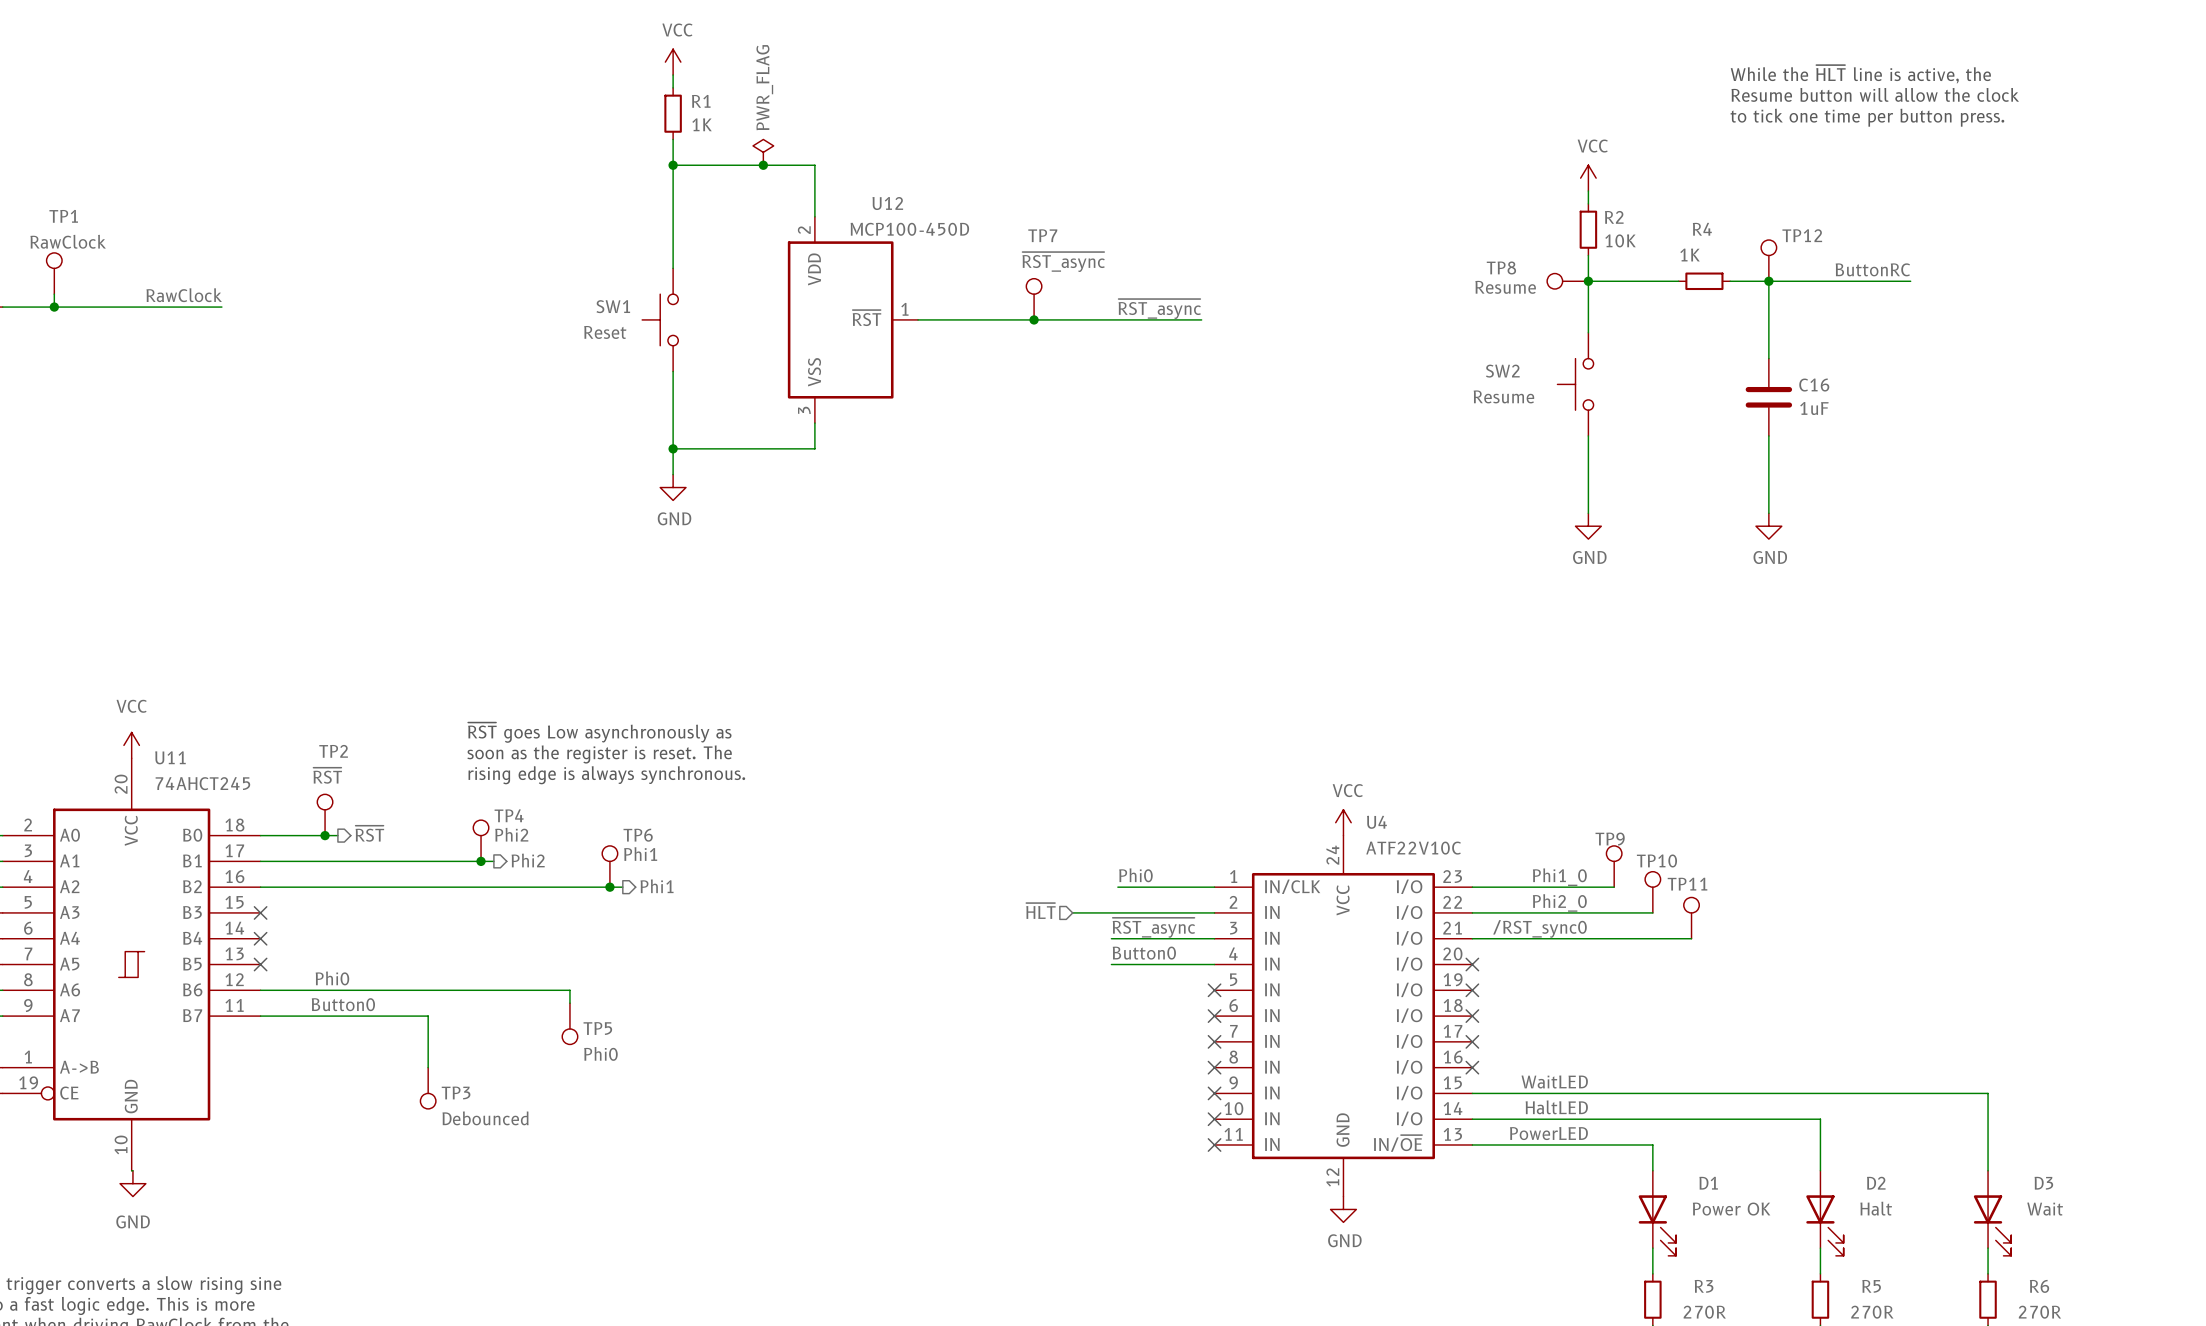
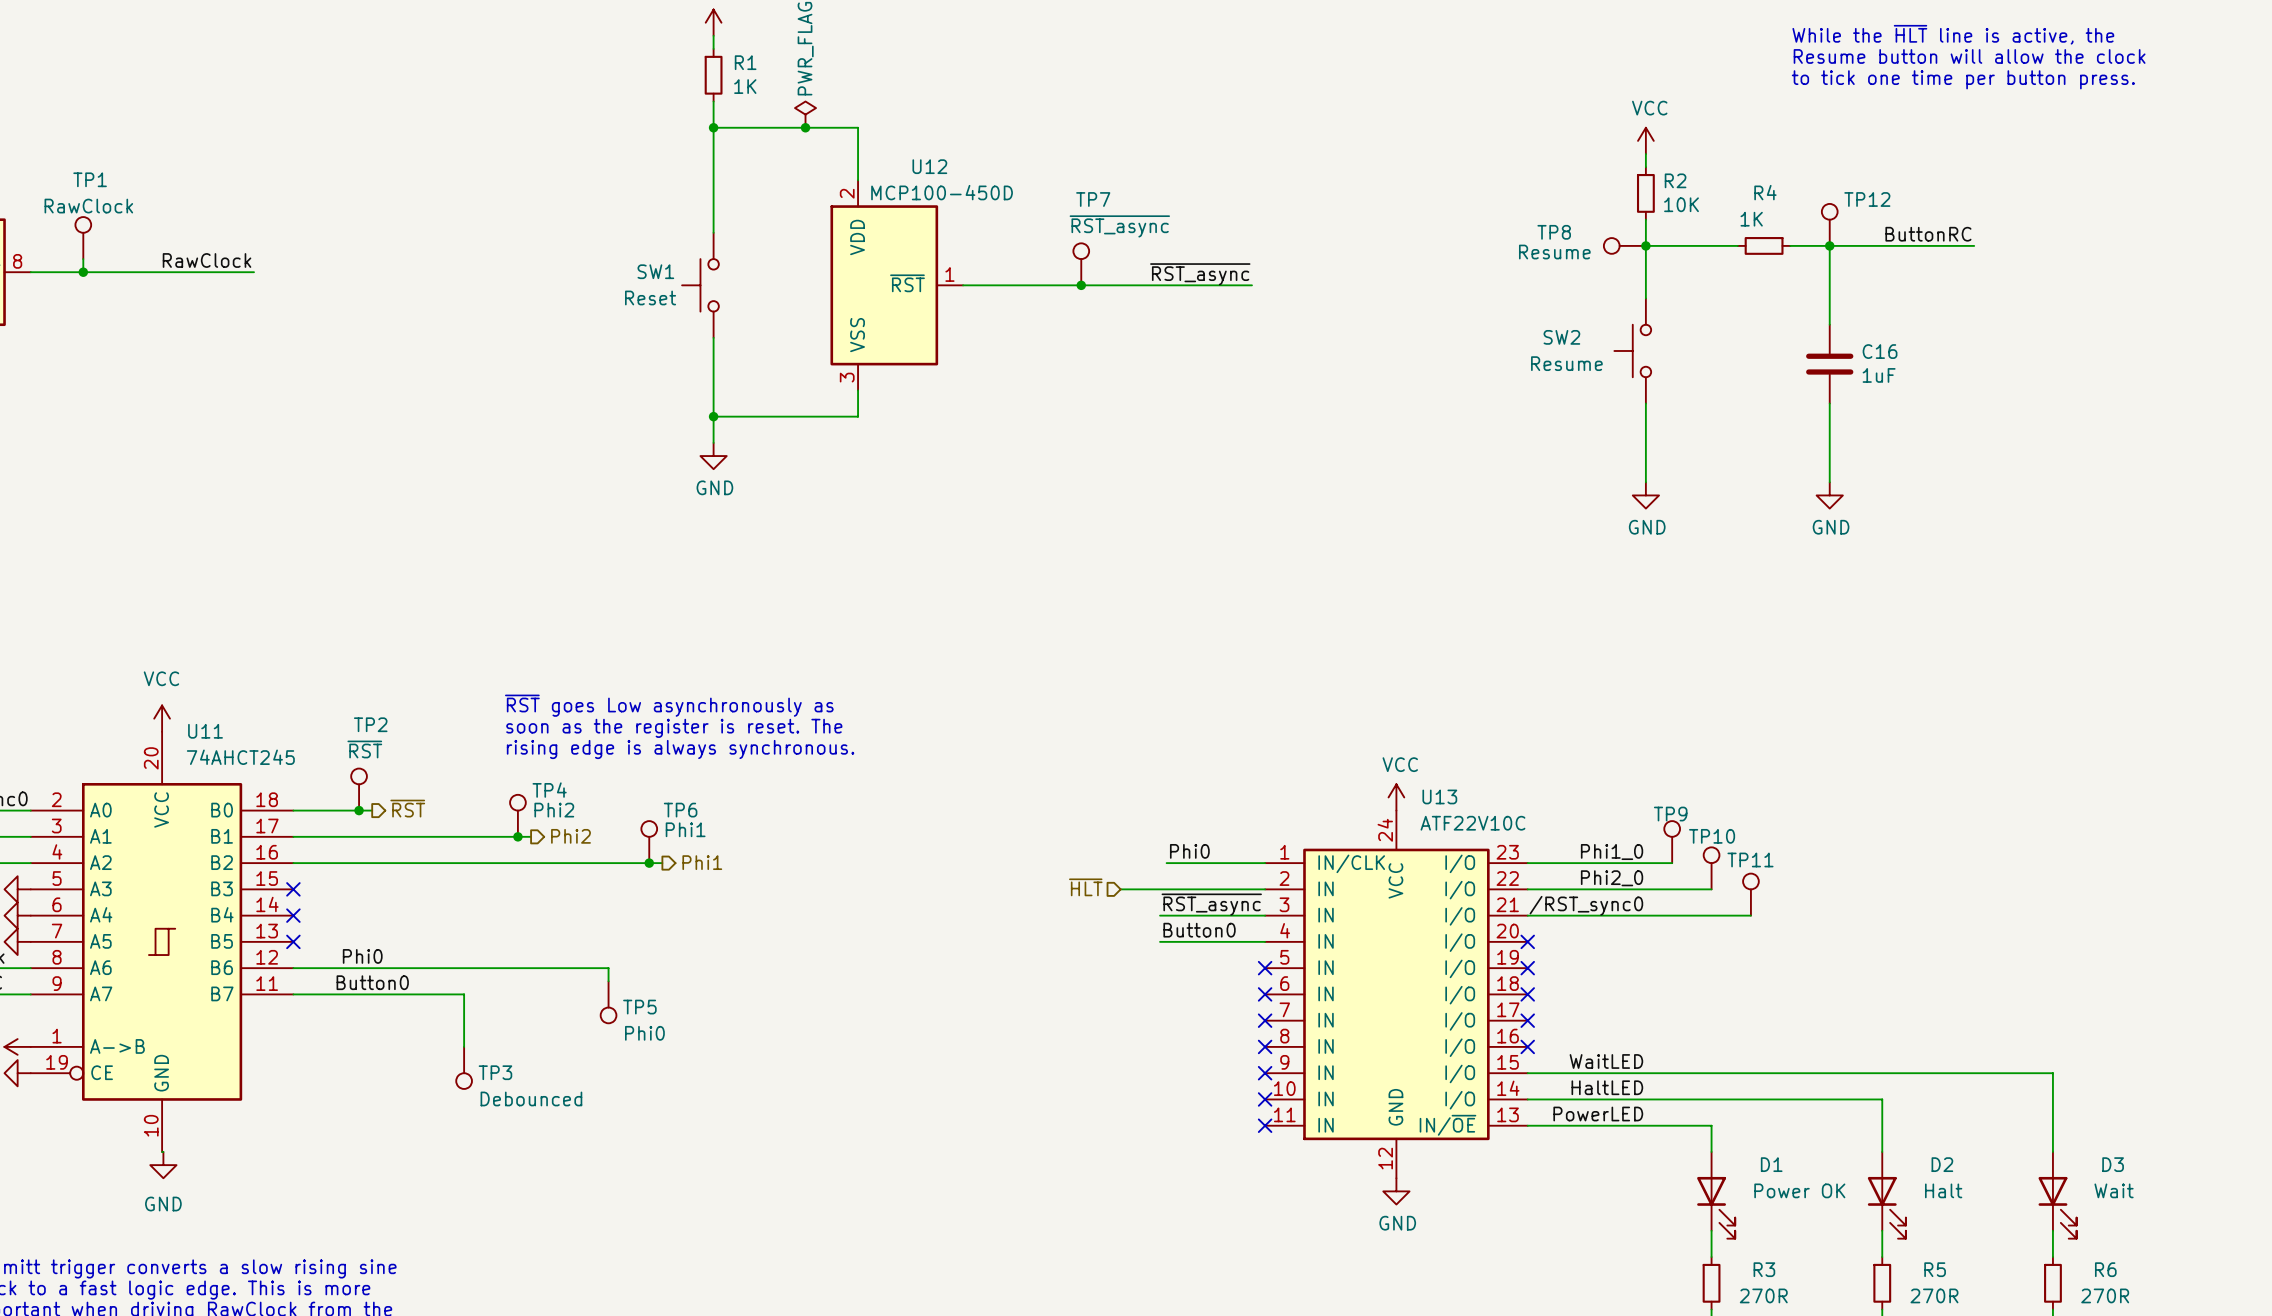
U4 name: U4 (1376, 822) -> U13 (1439, 796)

